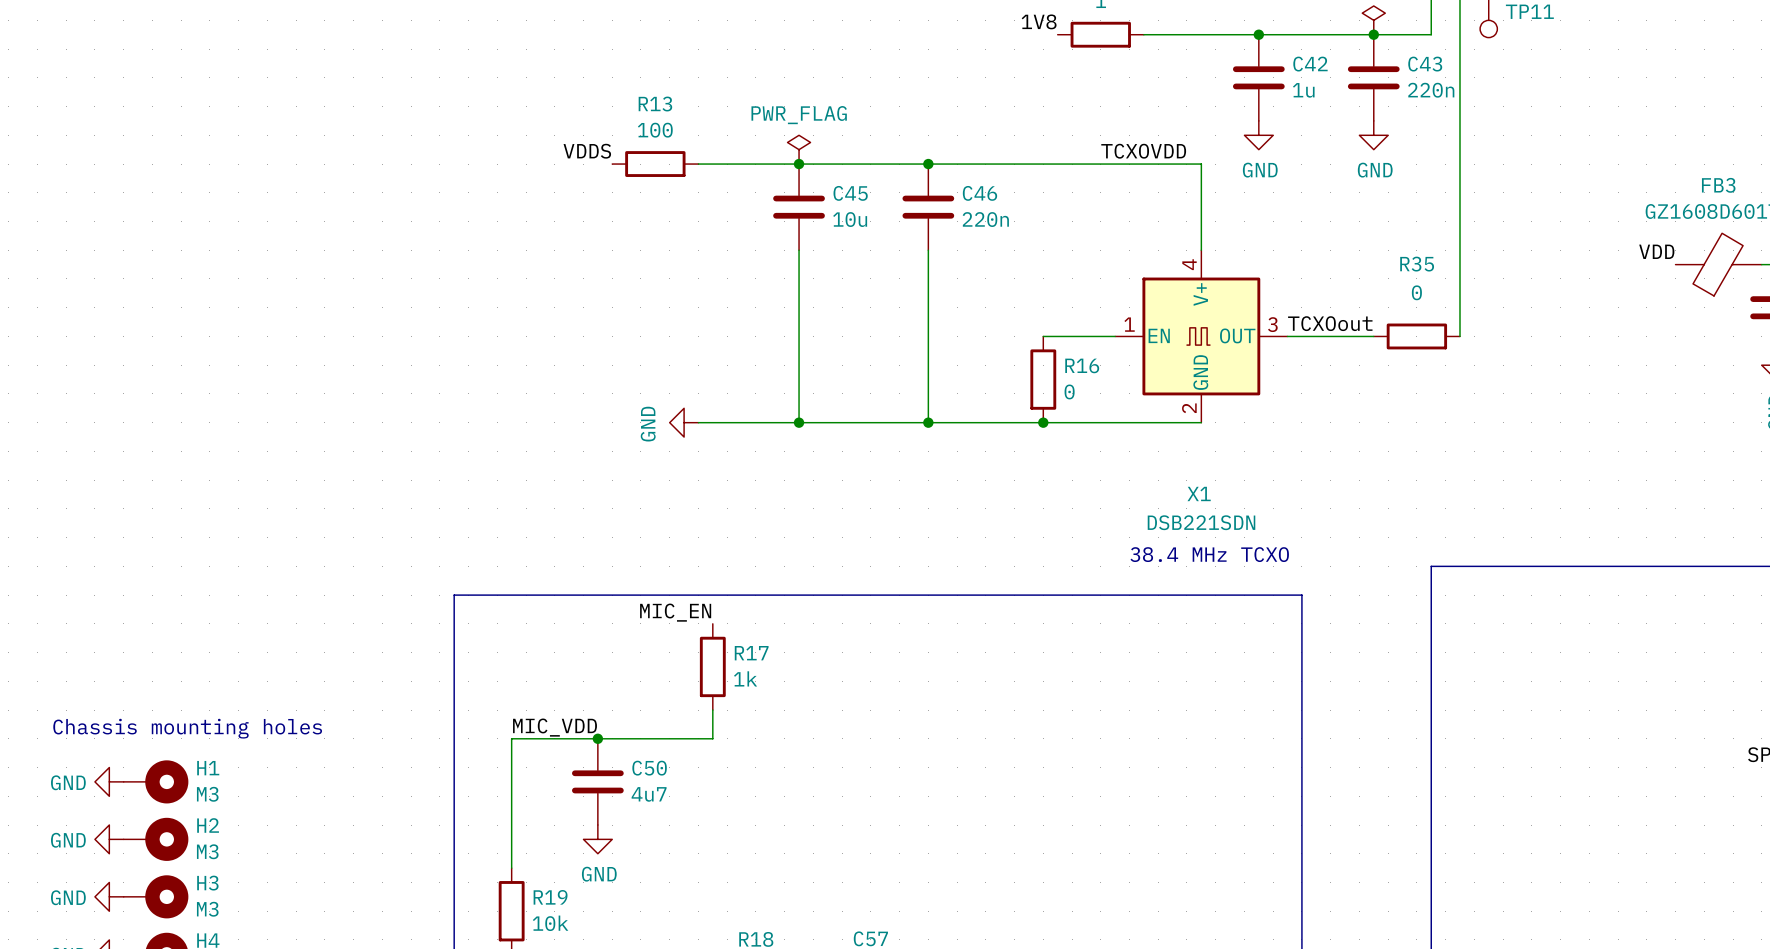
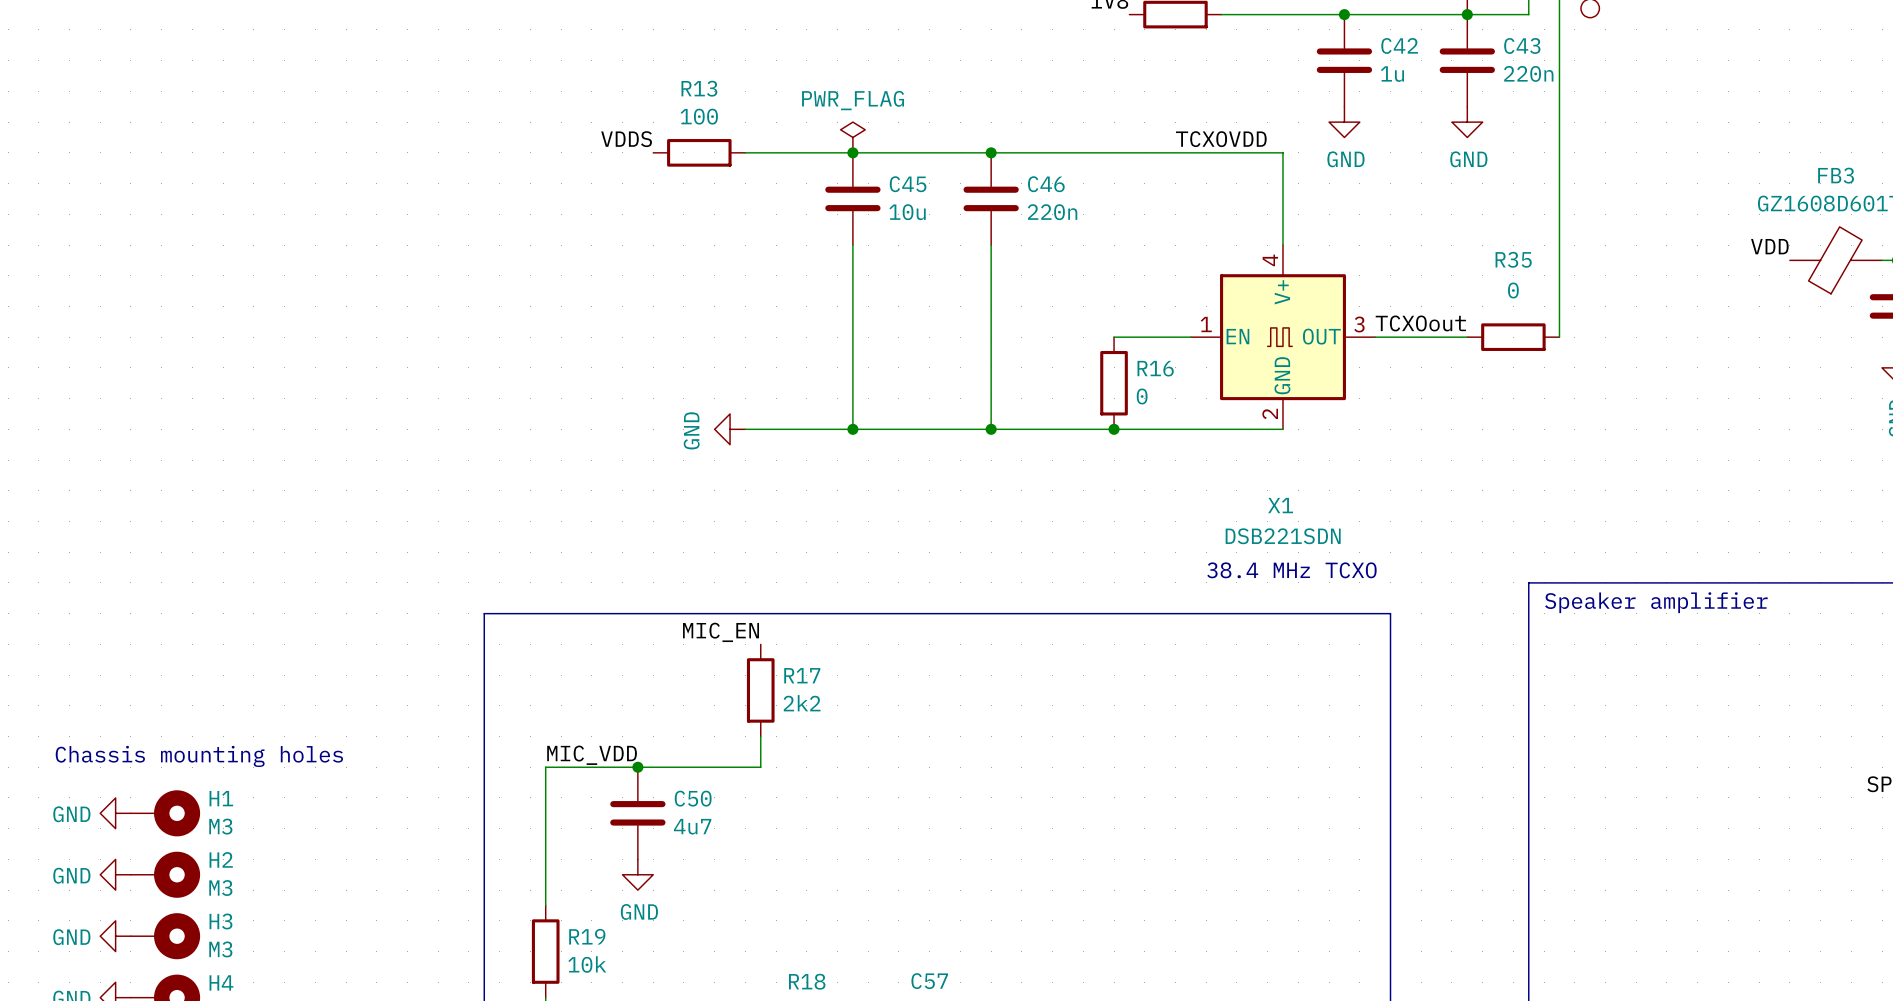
text: none -> Speaker amplifier (1656, 602)
R17 value: 1k (745, 678) -> 2k2 (802, 703)

